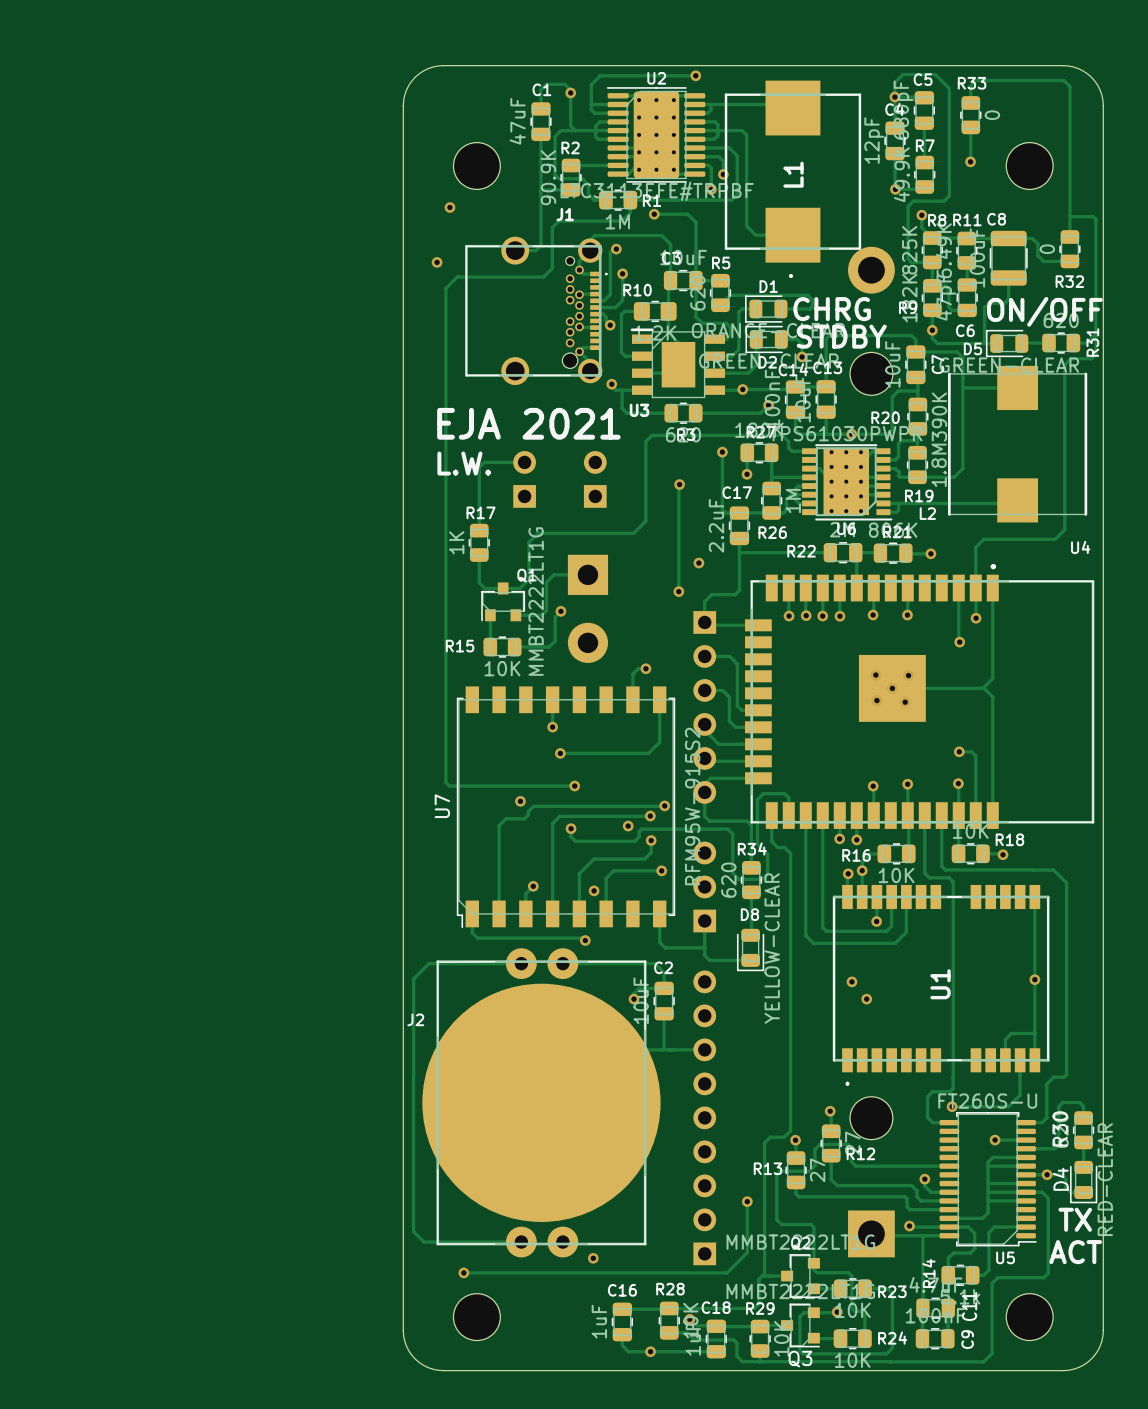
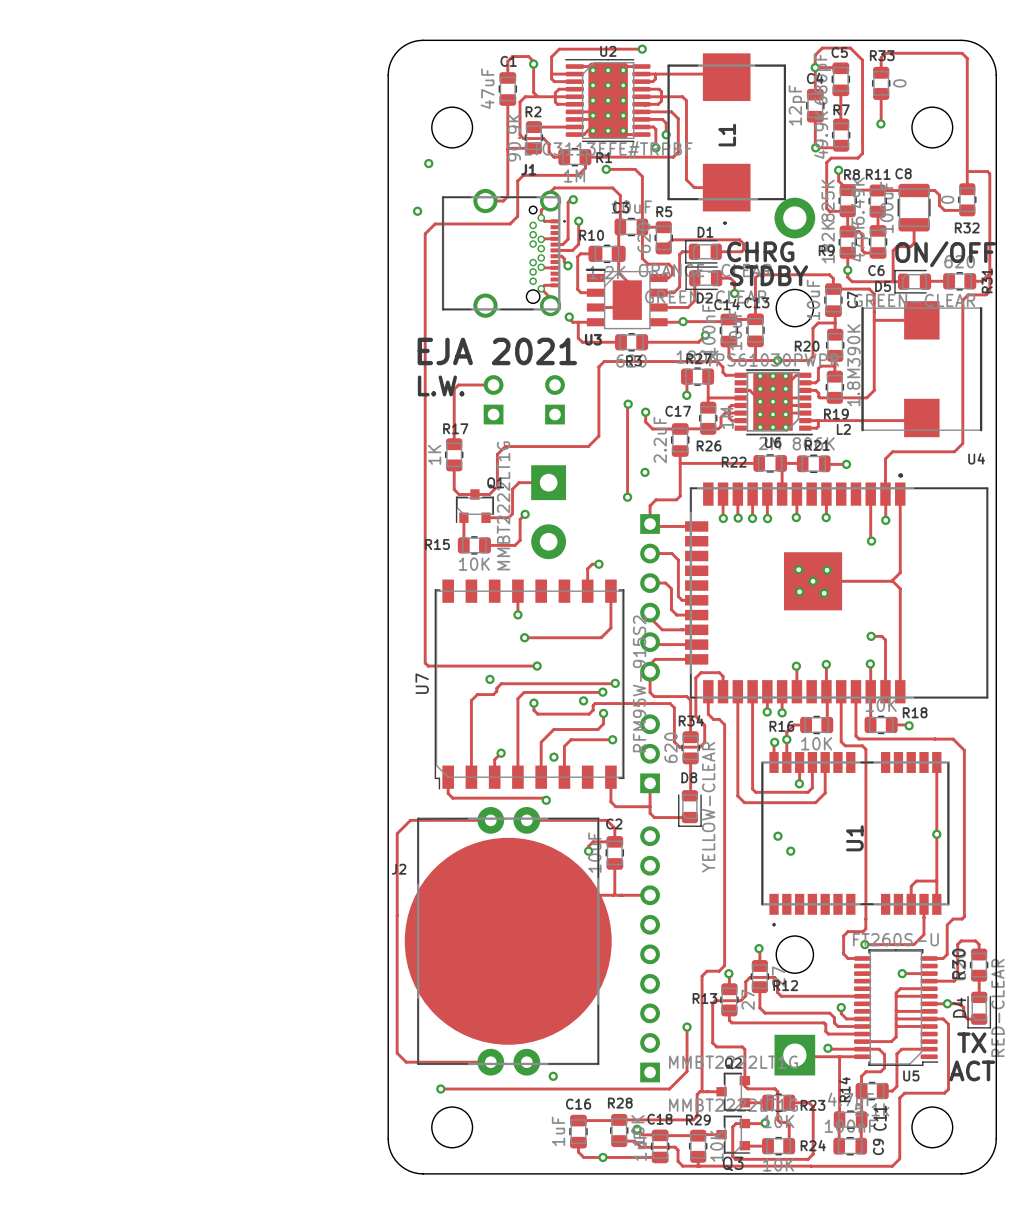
track: (722, 452) (722, 509) (725, 513) -> (645, 412) (645, 422) (652, 428) (668, 428)
via position: (722, 452) -> (645, 412)

